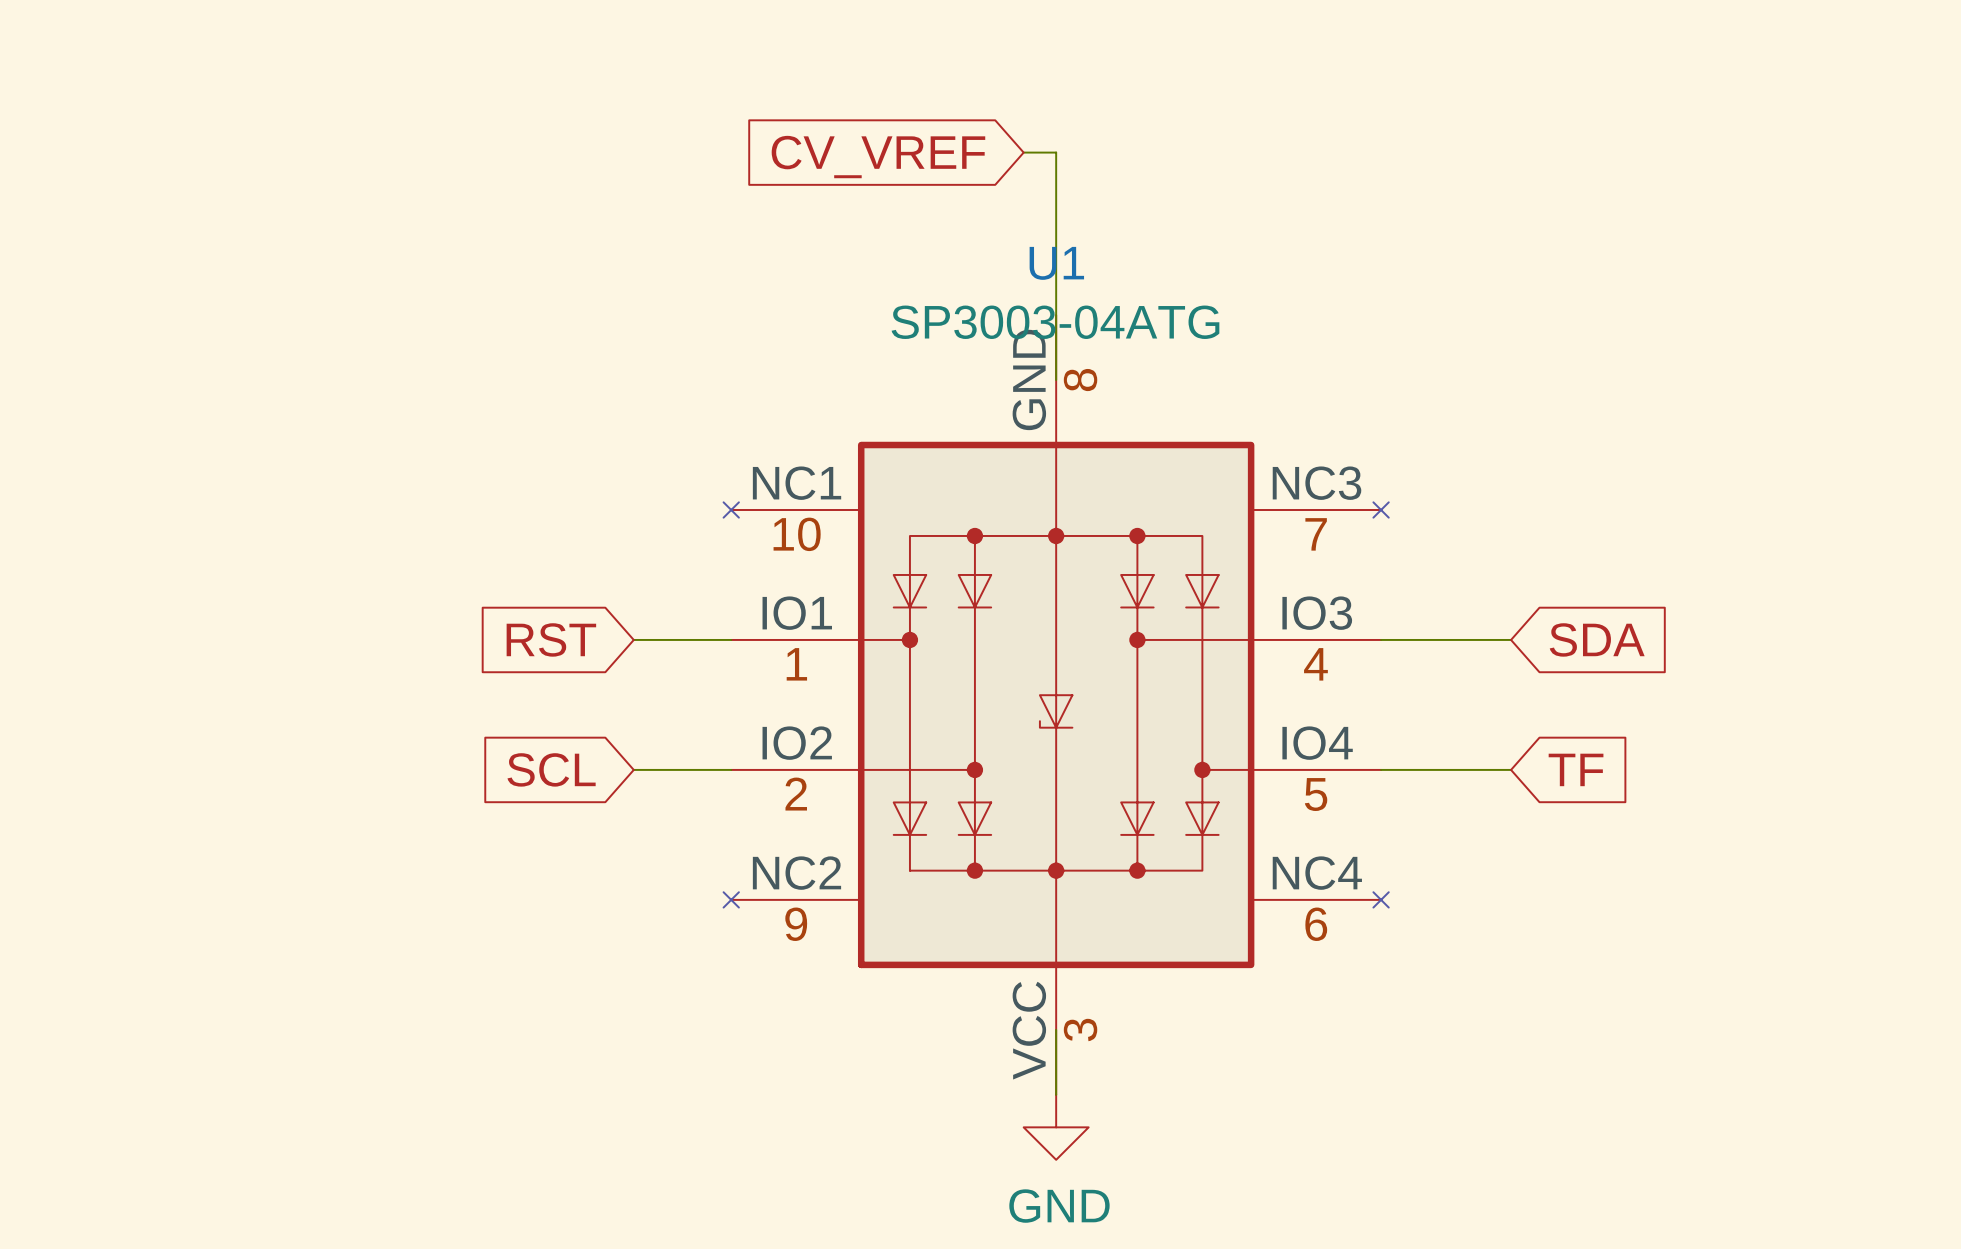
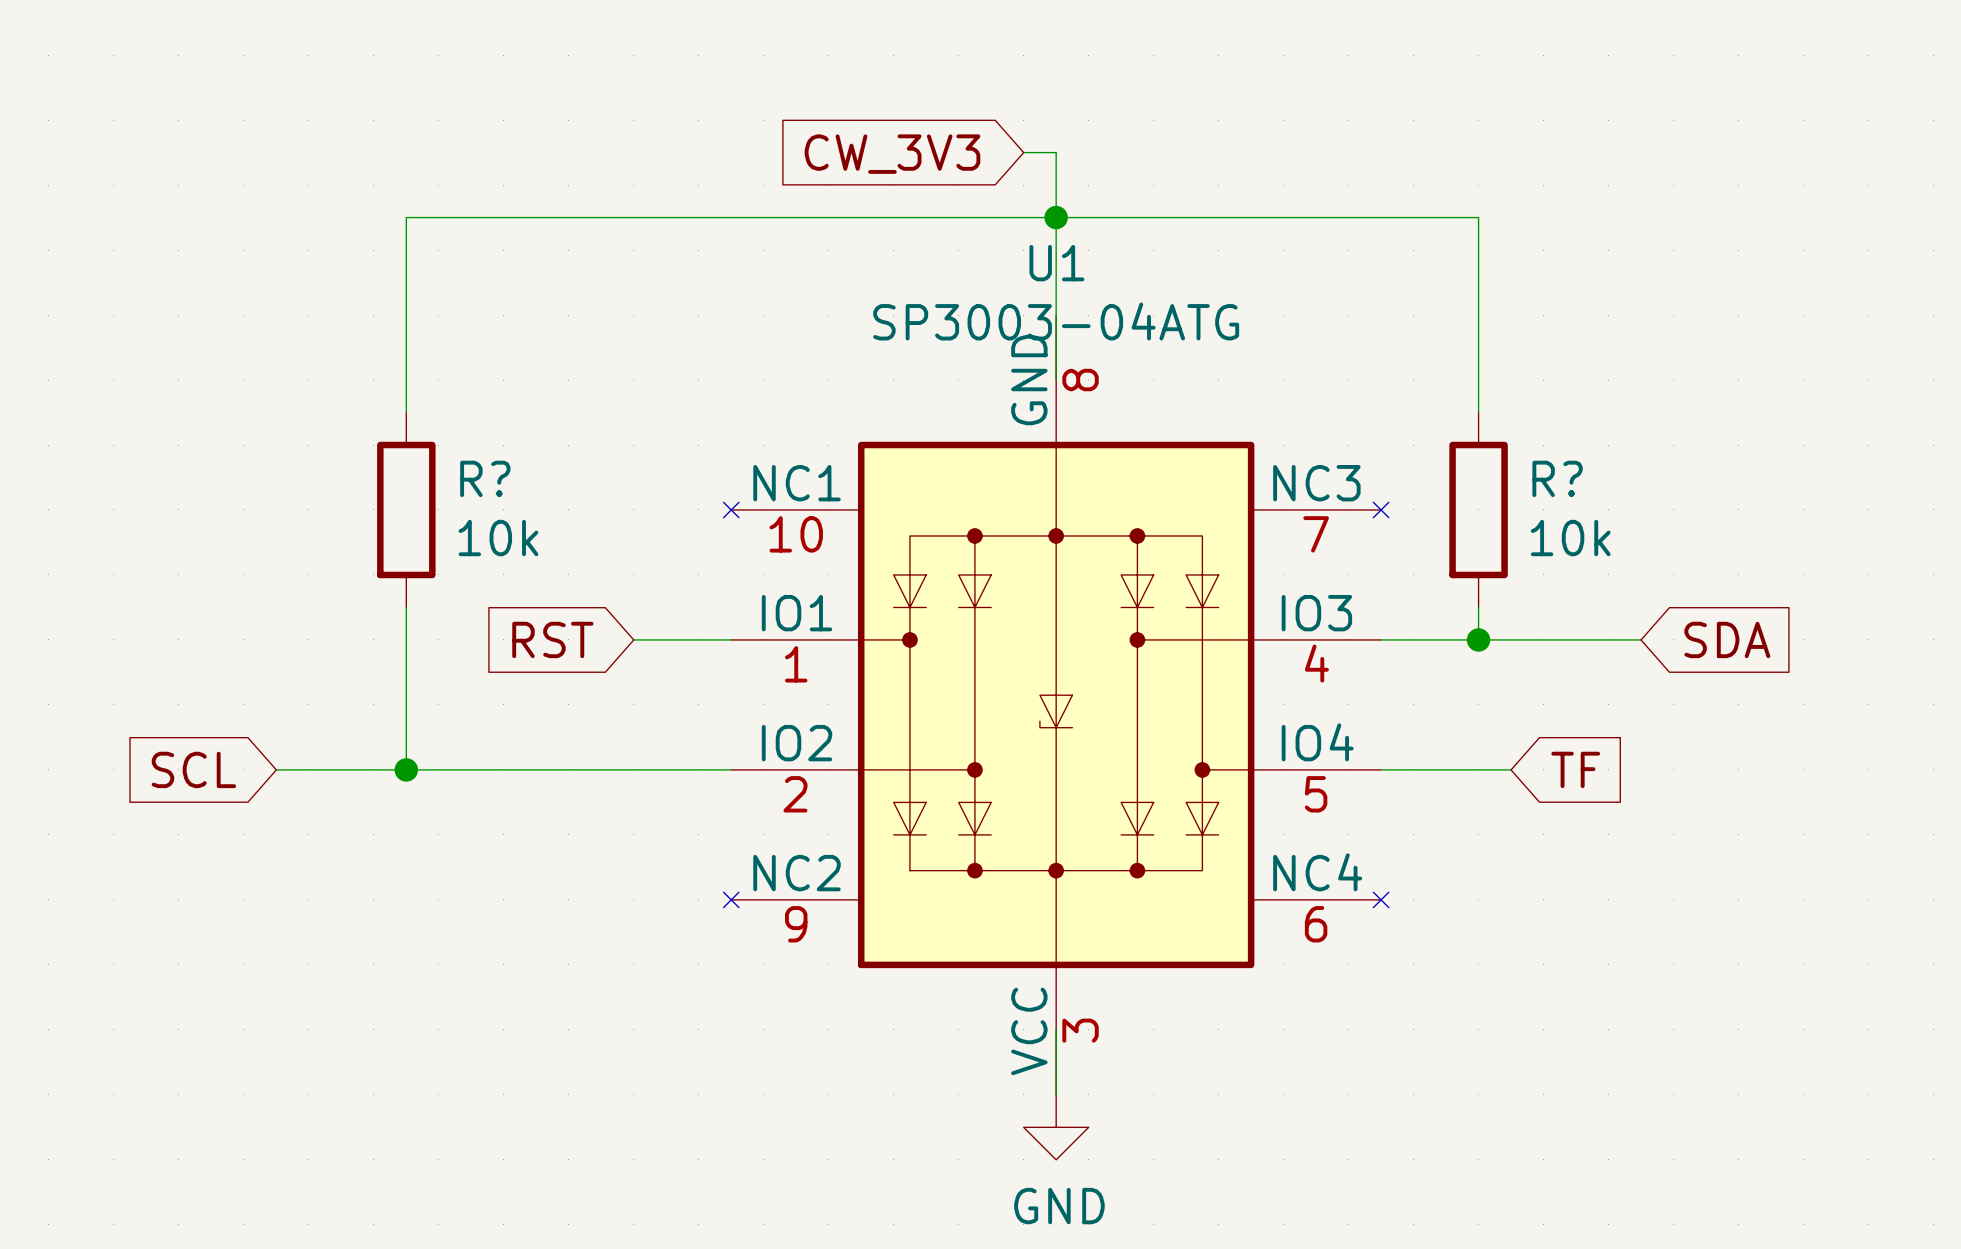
global label: CV_VREF (878, 157) -> CW_3V3 (892, 154)
junction: none -> (1056, 217)
wire: none -> (406, 412) (406, 217) (1478, 217) (1478, 412)
R?: none -> 10k (406, 509)
R?: none -> 10k (1478, 509)
wire: none -> (406, 607) (406, 769)
wire: none -> (1478, 607) (1478, 639)
junction: none -> (1478, 639)
wire: none -> (1511, 639) (1641, 639)
global label position: SDA (1597, 639) -> SDA (1727, 639)
wire: none -> (276, 769) (633, 769)
junction: none -> (406, 769)
global label position: SCL (551, 769) -> SCL (193, 769)

